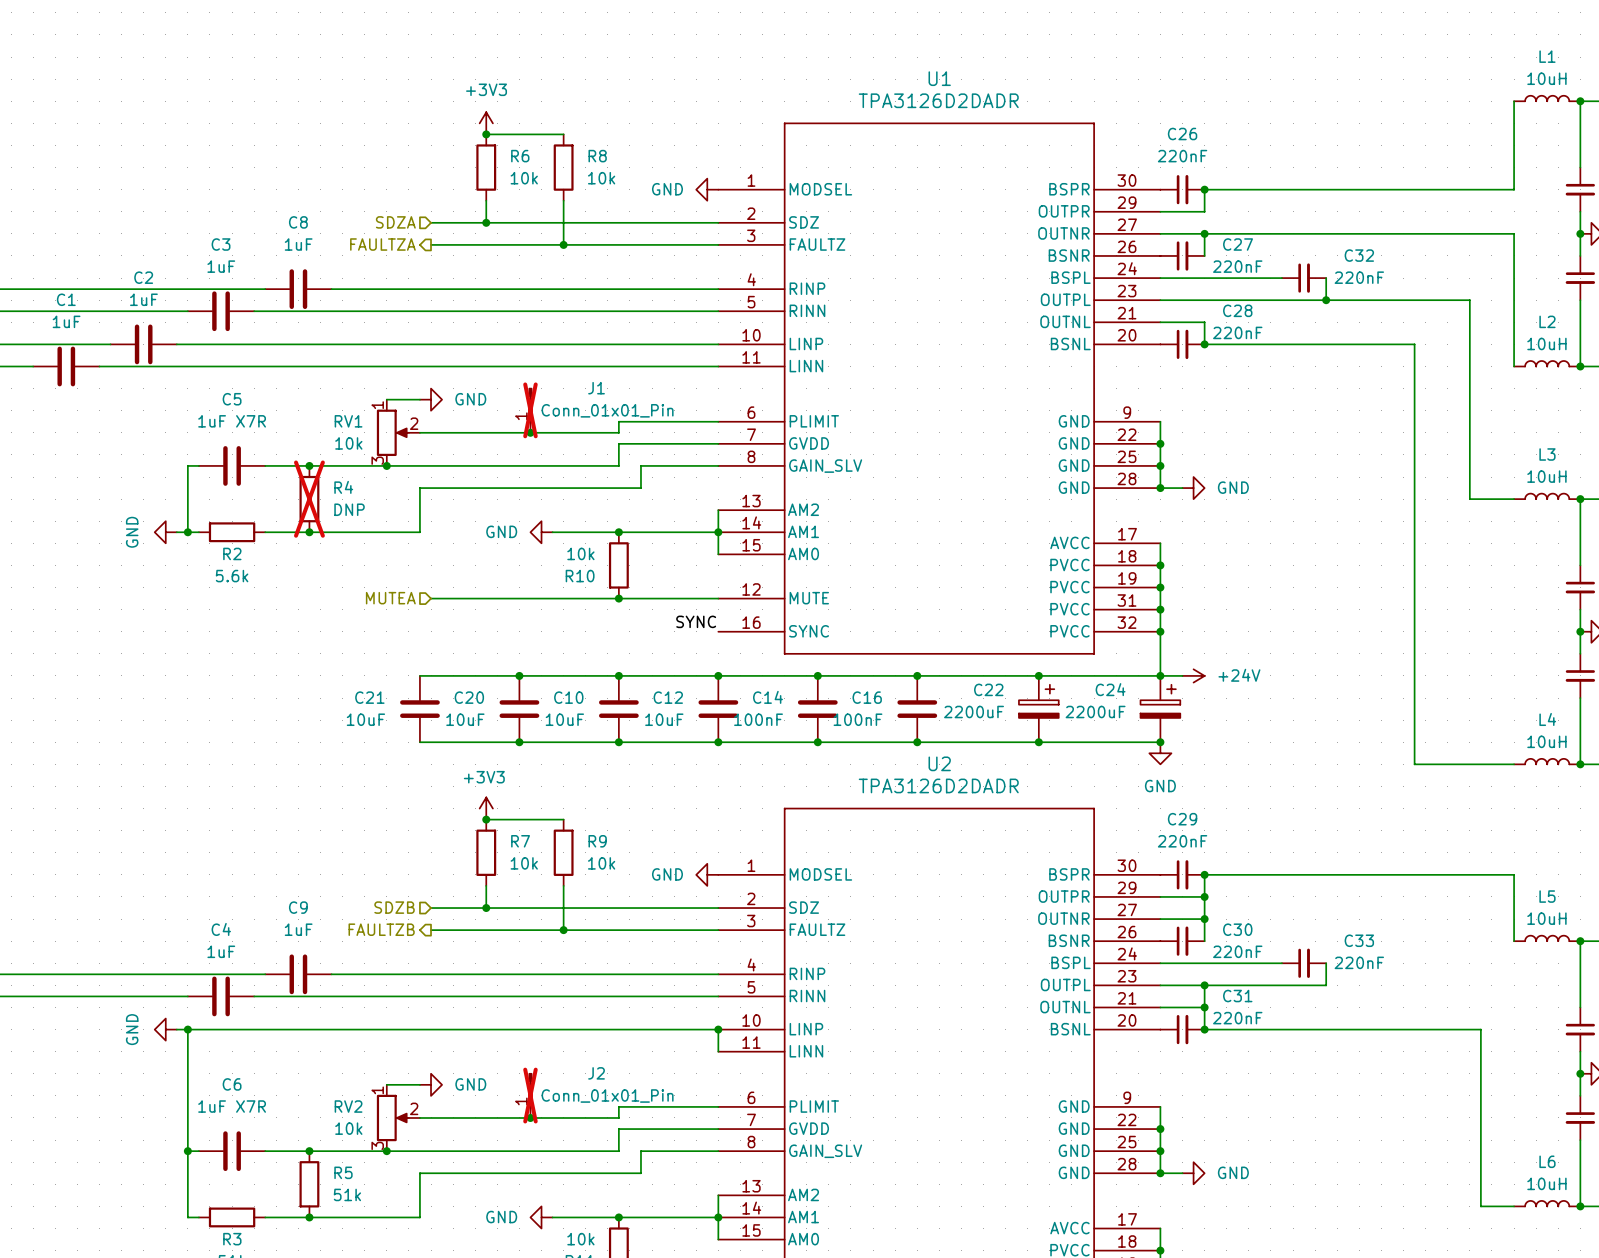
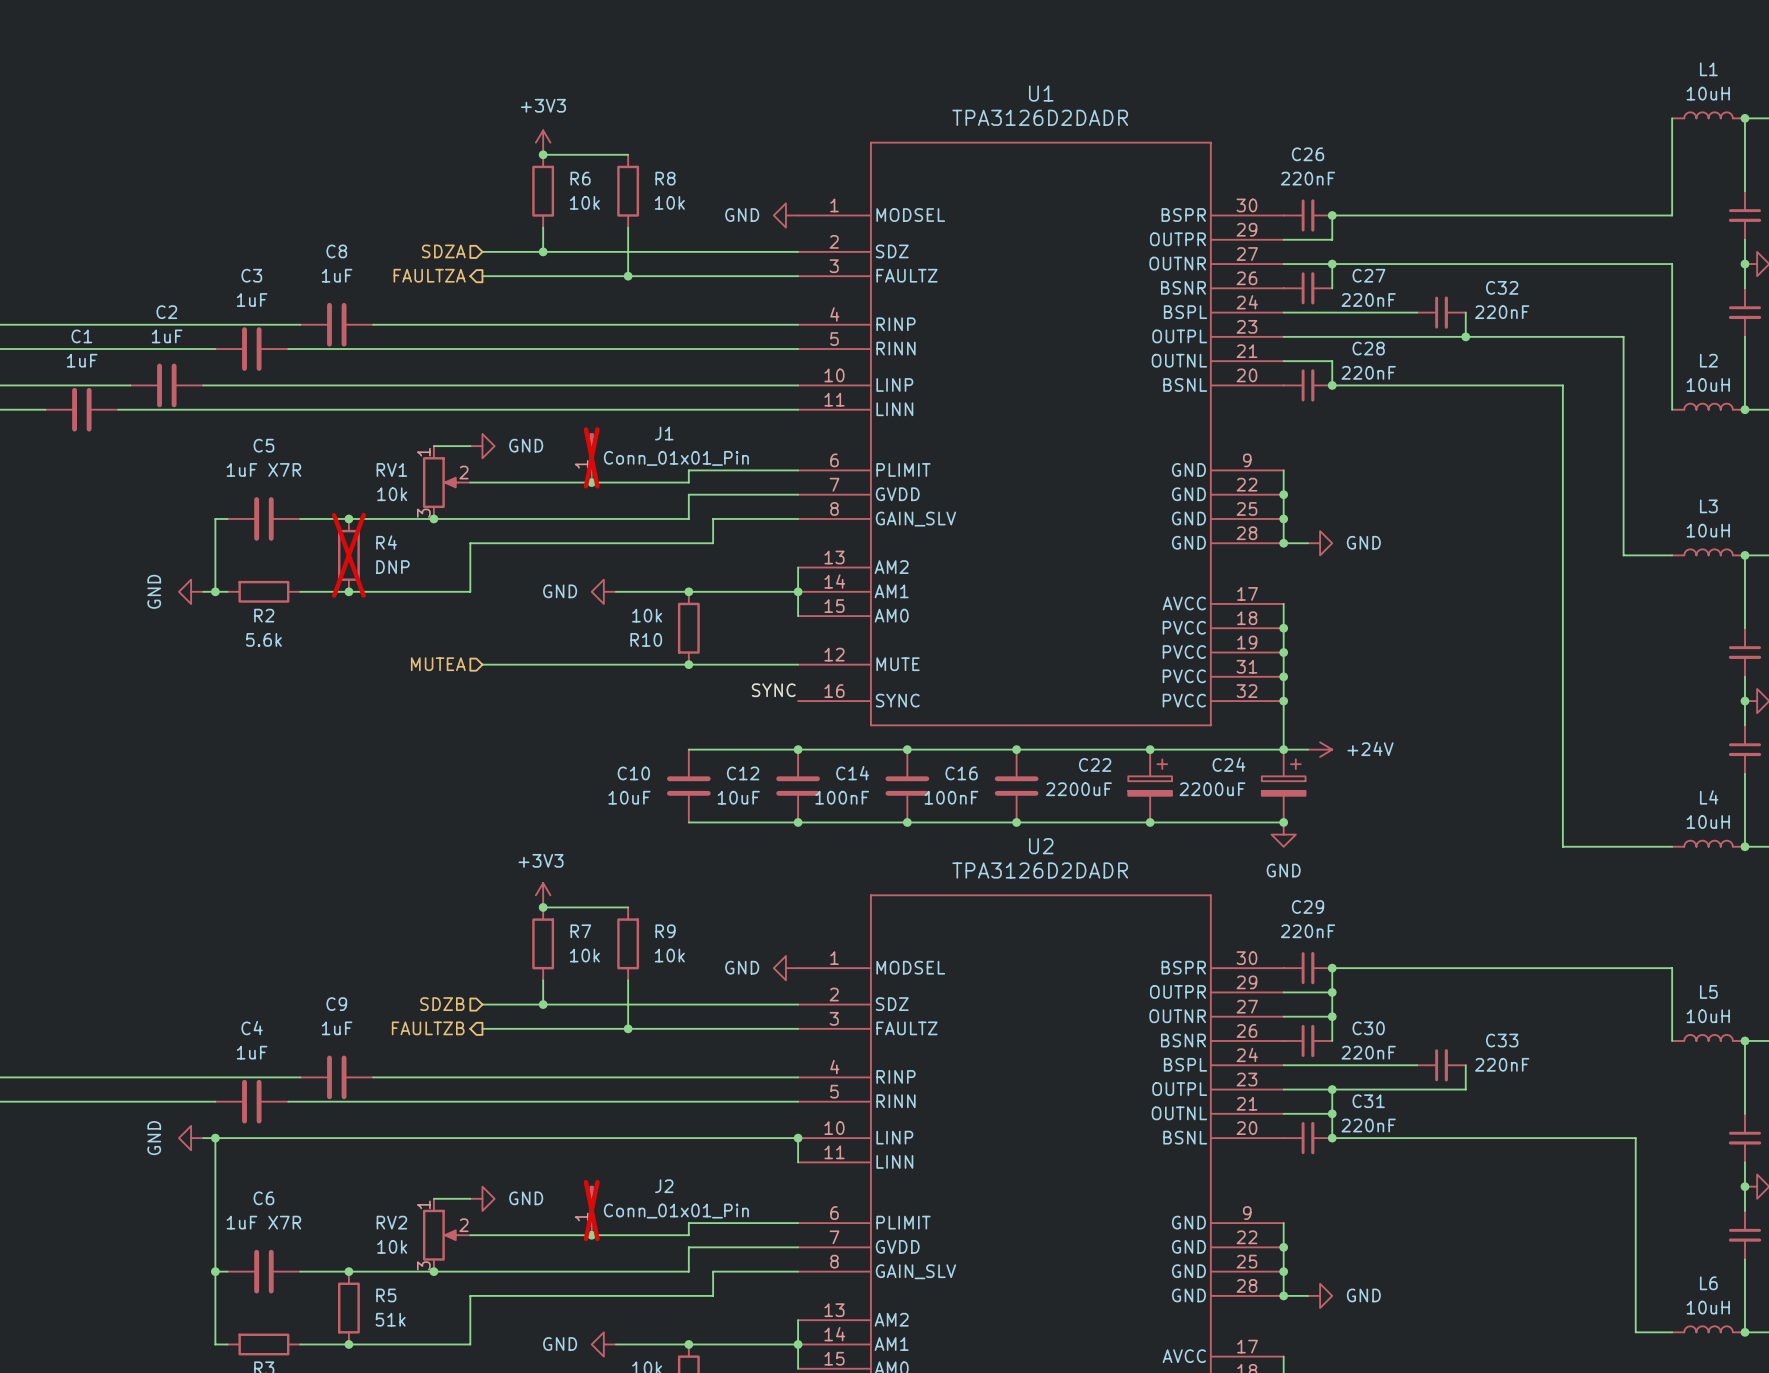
wire: (419, 675) (618, 675) -> none
junction: (519, 675) -> none
junction: (618, 675) -> none
C21: 10uF (419, 709) -> none
C20: 10uF (519, 709) -> none
wire: (419, 742) (618, 742) -> none
junction: (519, 742) -> none
junction: (618, 742) -> none

